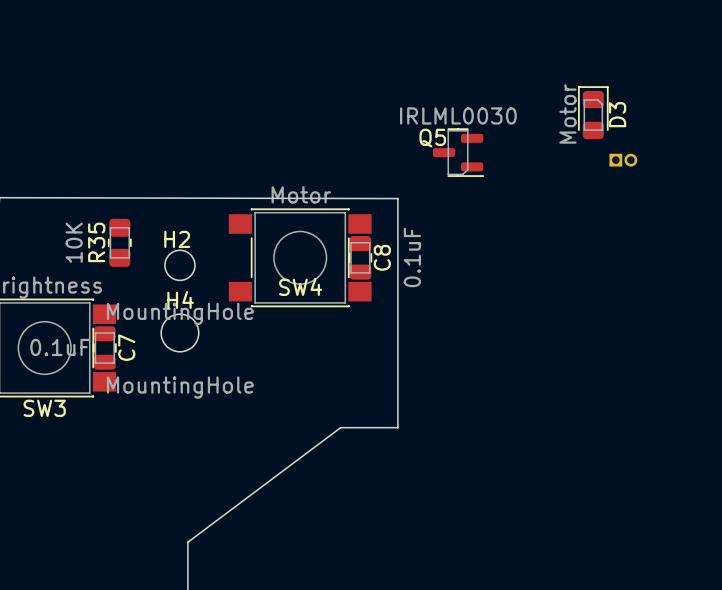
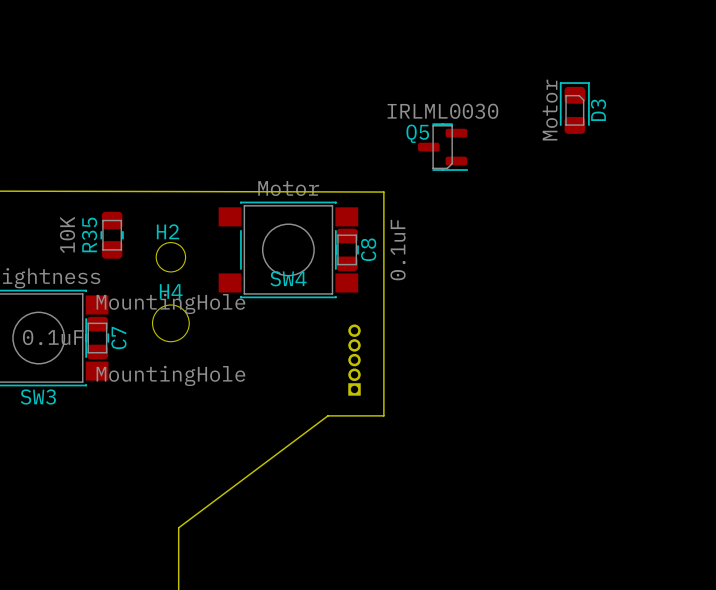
part: (623, 160) -> none
part: none -> (354, 360)

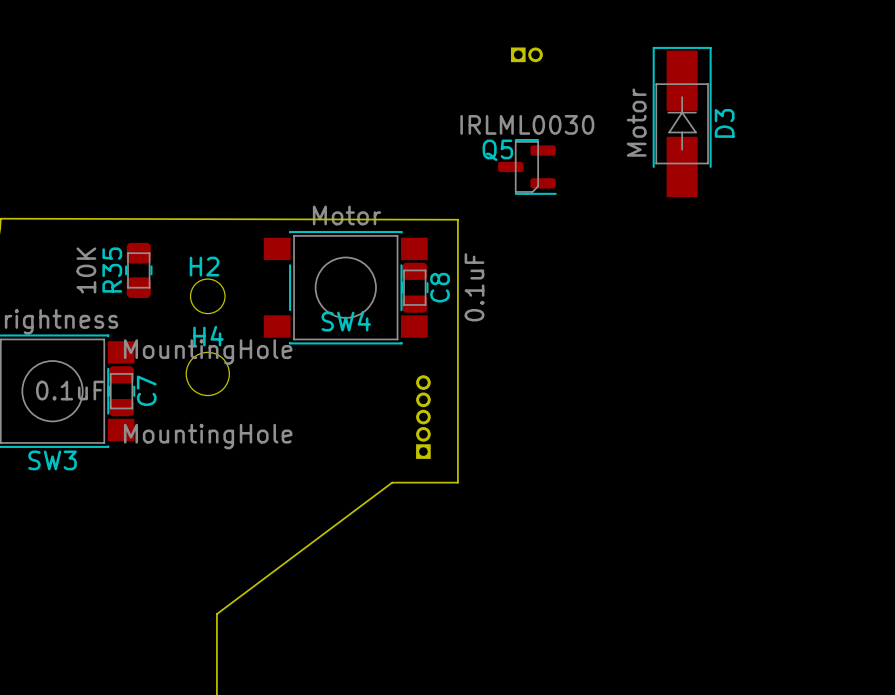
part: none -> (526, 54)
D3 footprint: [559, 82, 590, 134] -> [652, 46, 712, 198]

